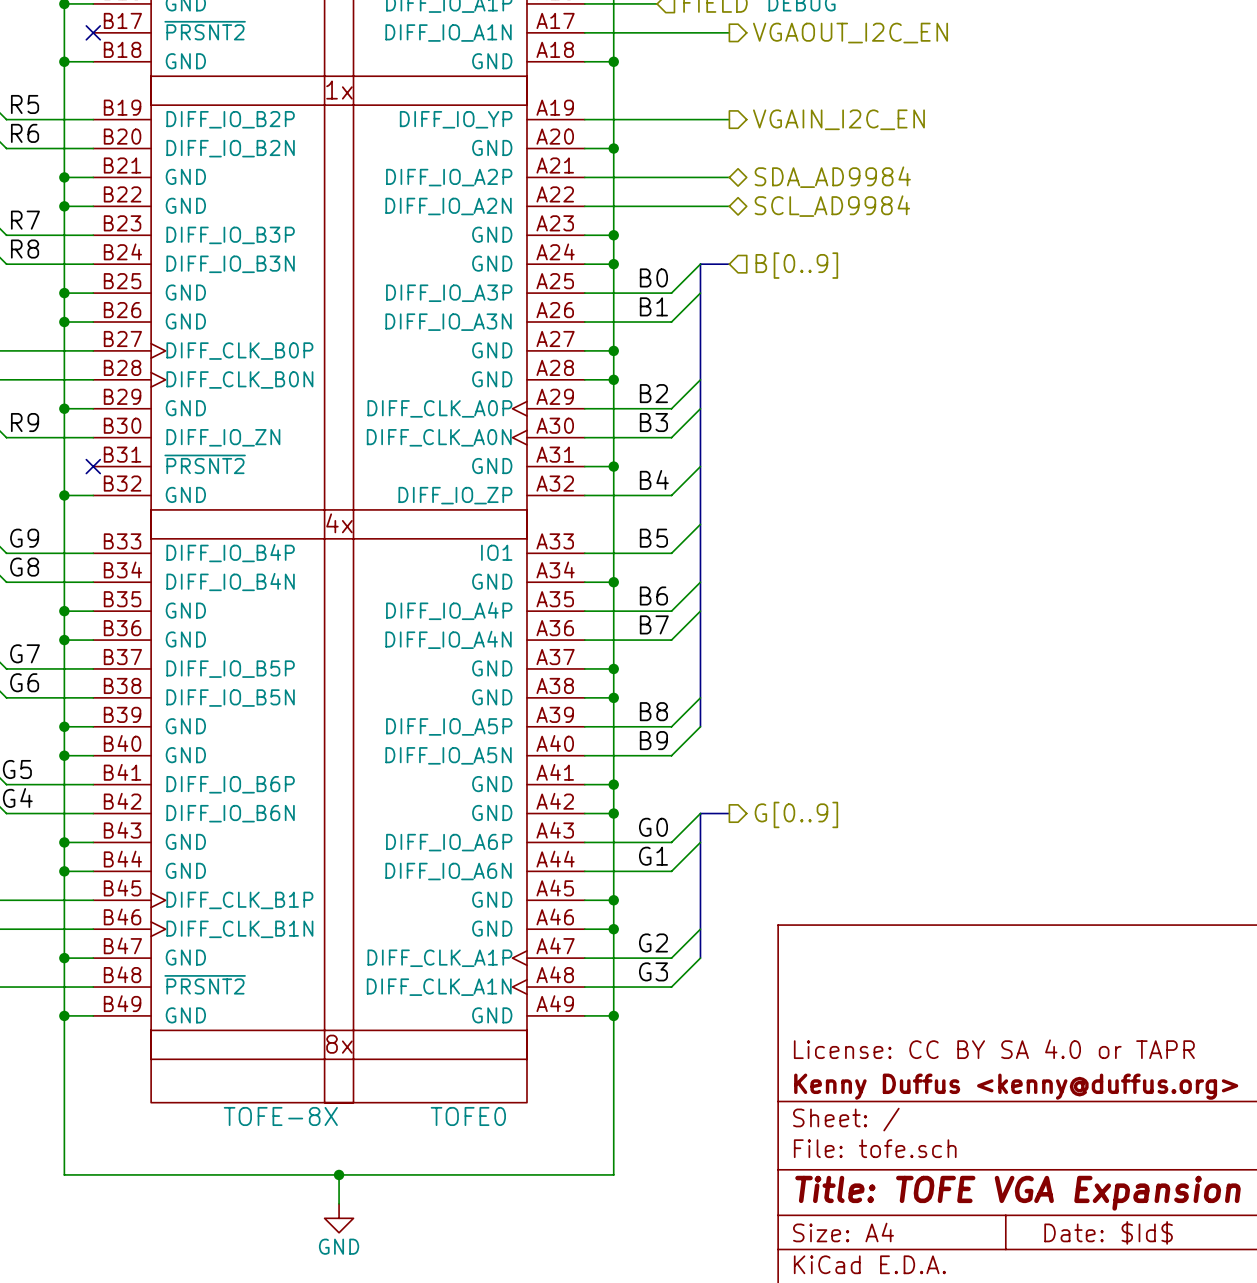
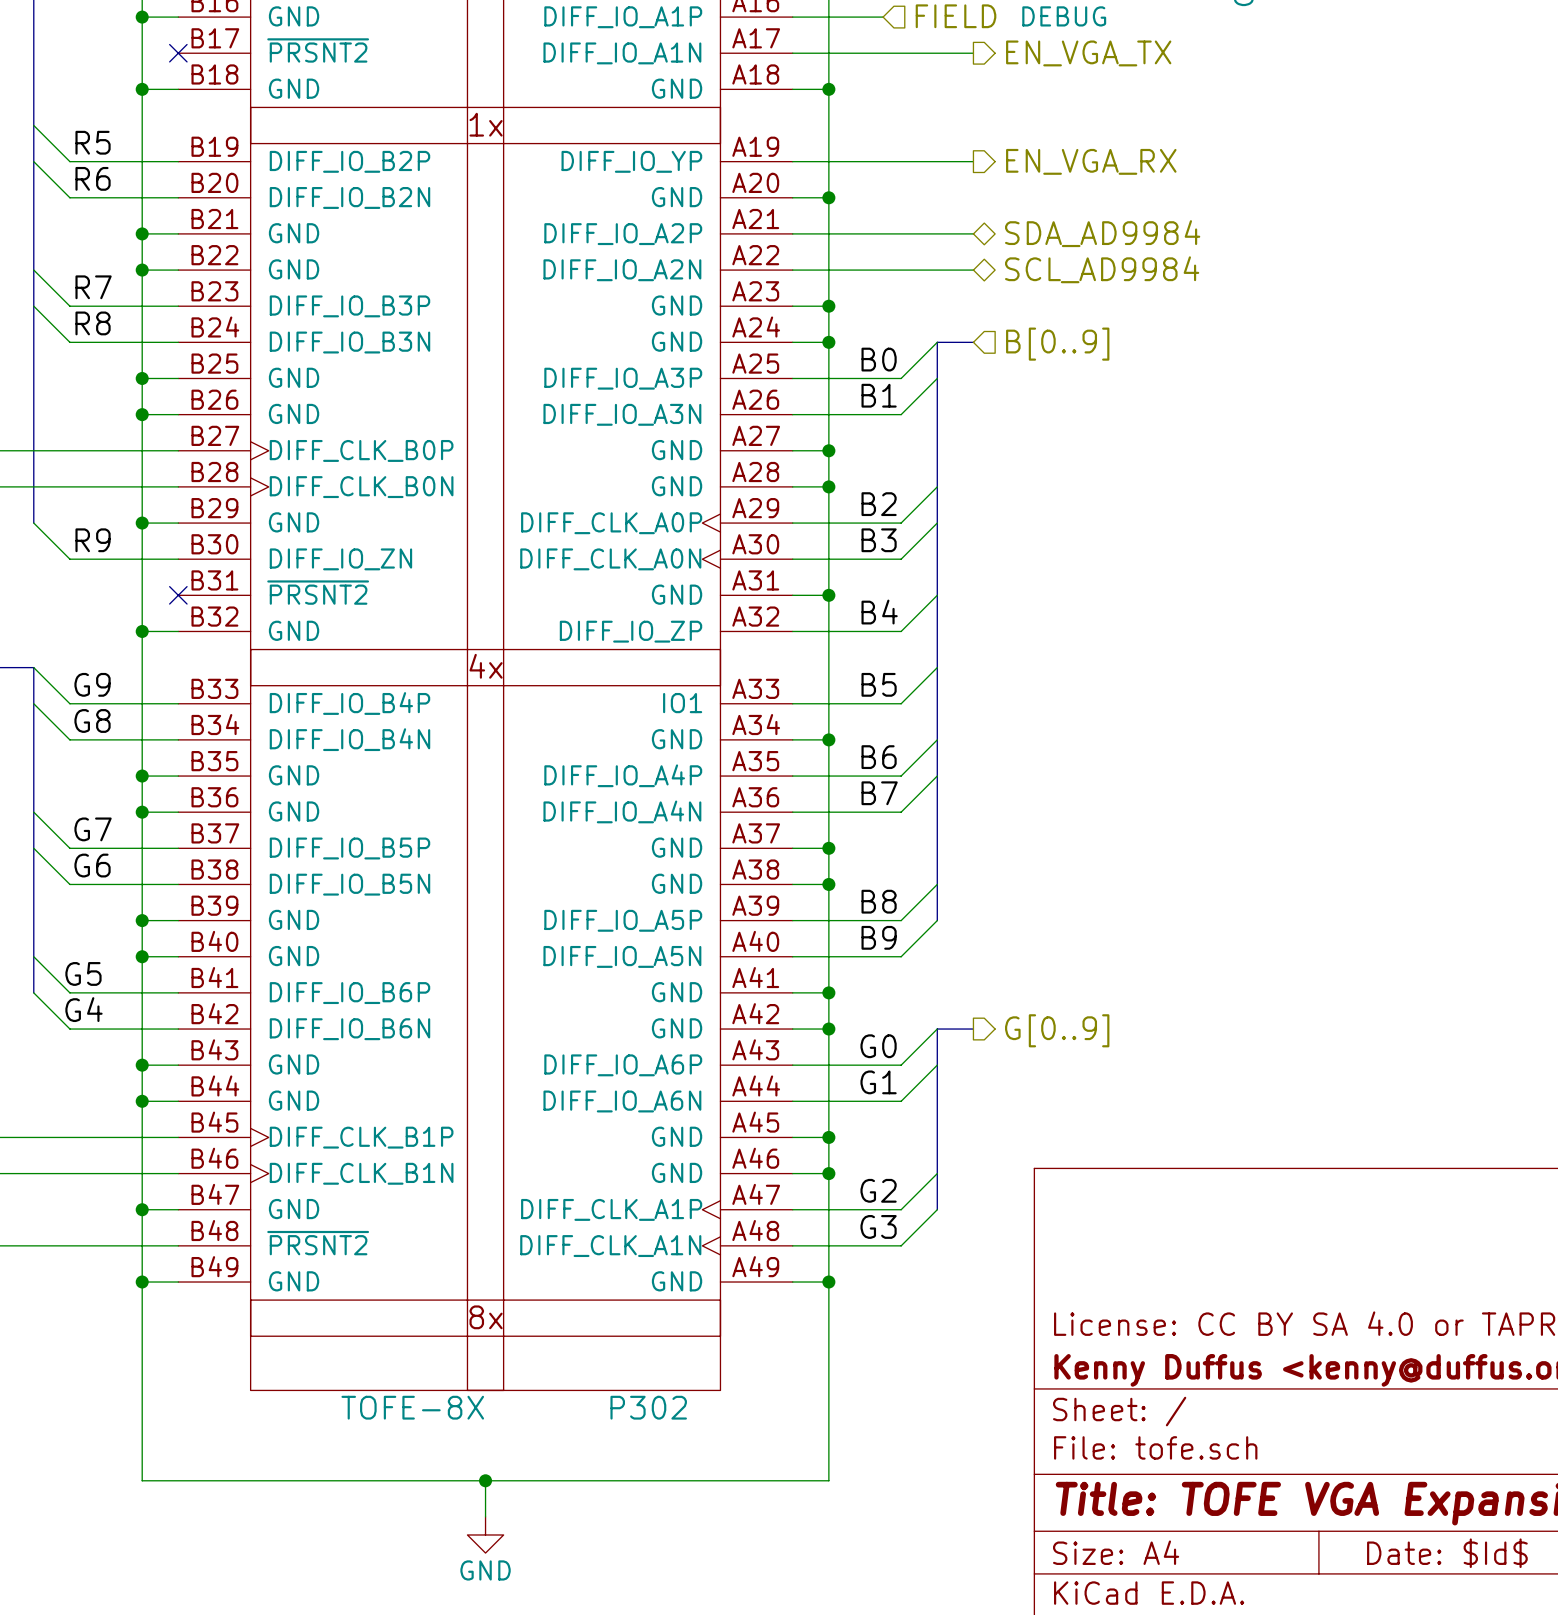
hierarchical label: VGAOUT_I2C_EN (850, 33) -> EN_VGA_TX (1088, 53)
hierarchical label: VGAIN_I2C_EN (838, 119) -> EN_VGA_RX (1091, 161)
TOFE0 name: TOFE0 (468, 1116) -> P302 (648, 1407)

